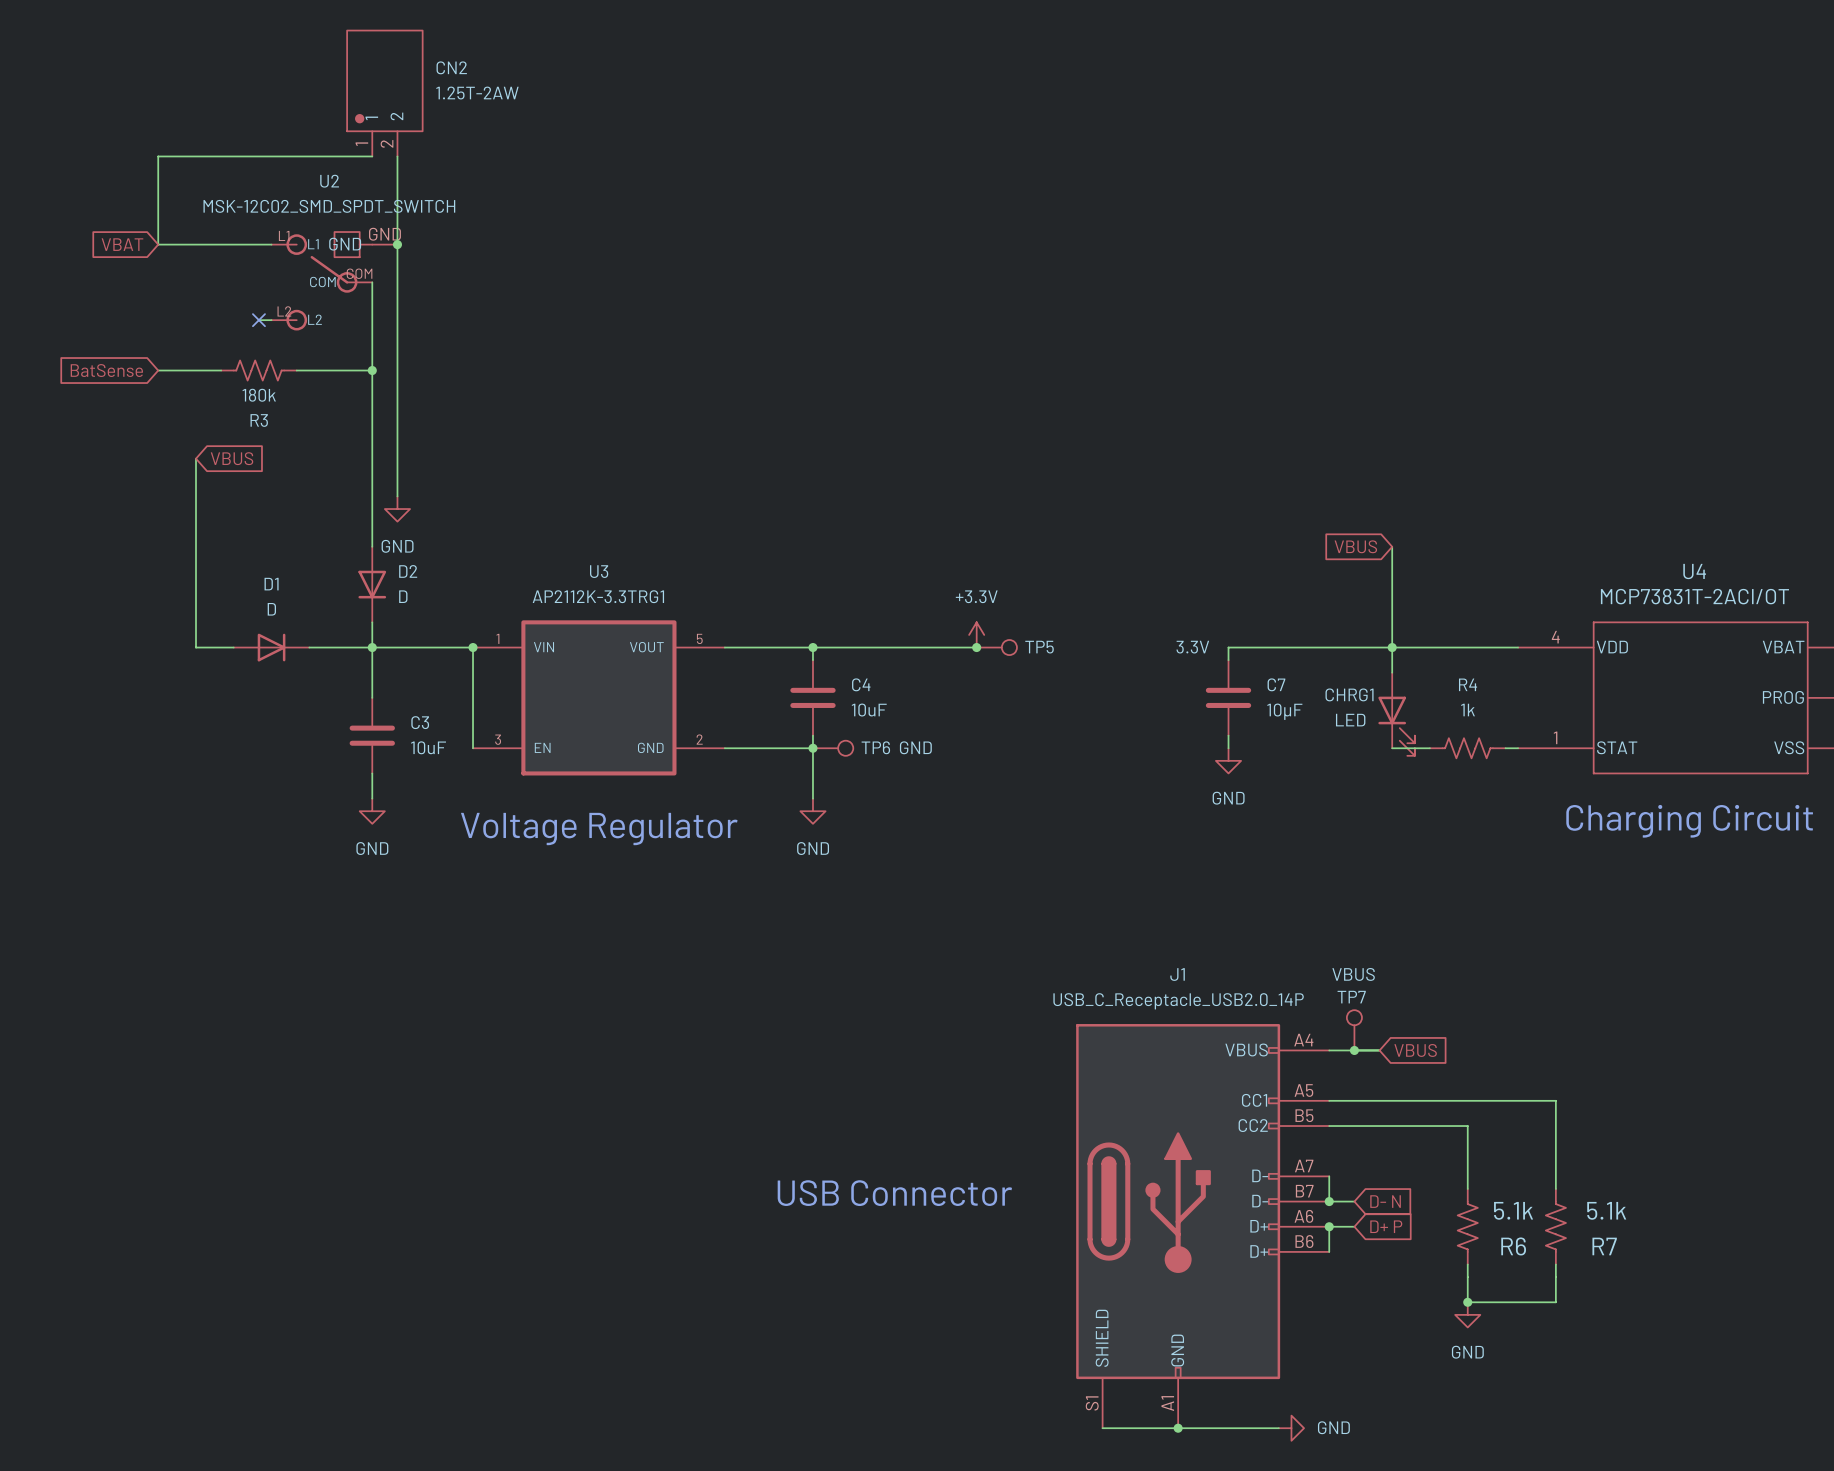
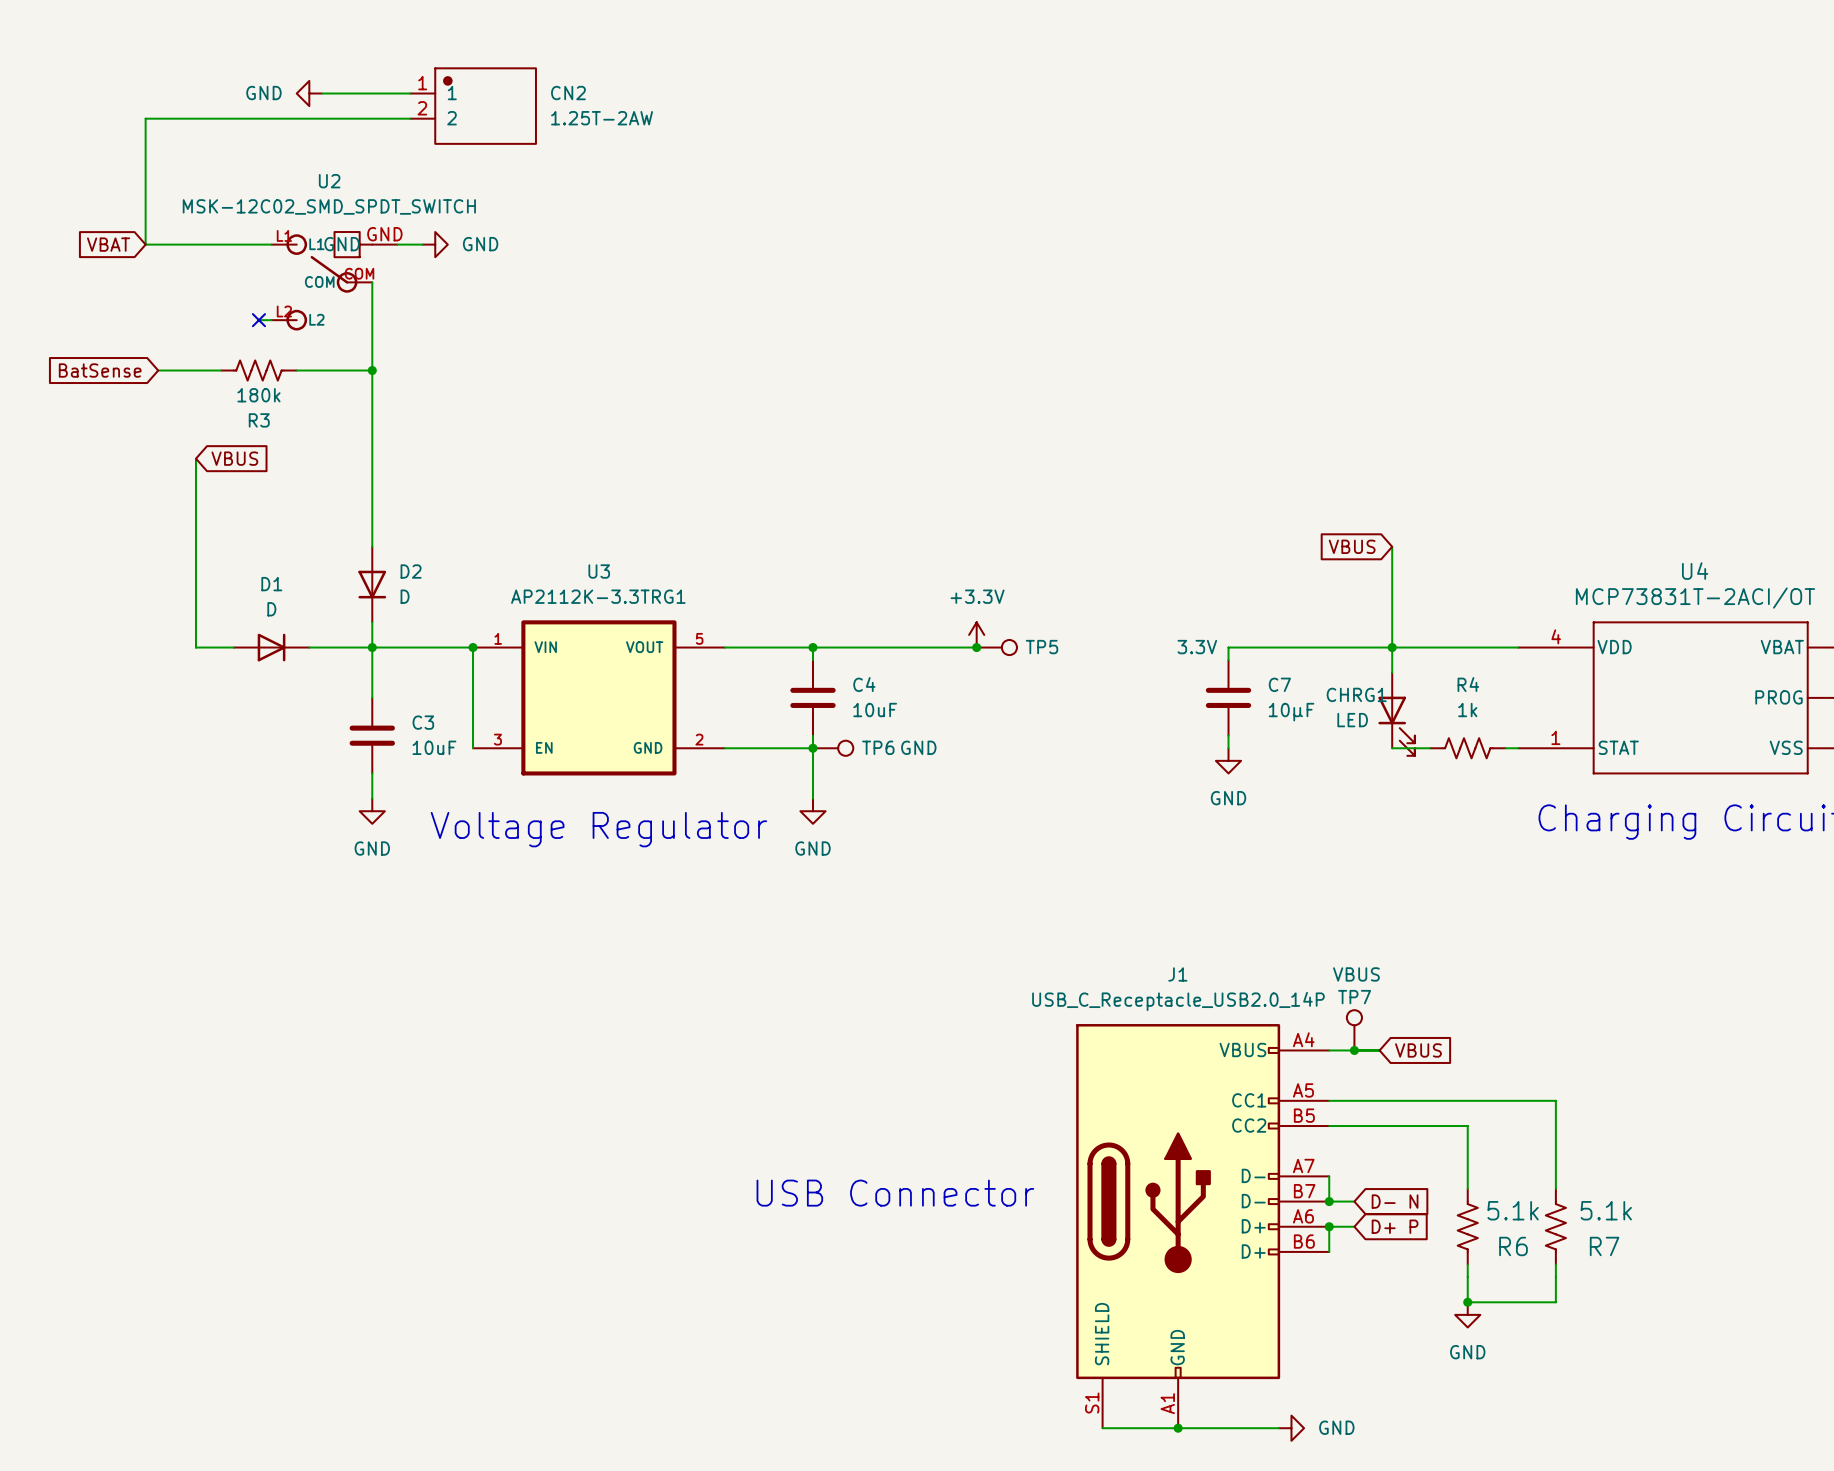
CN2 name position: CN2 (451, 67) -> CN2 (568, 93)
CN2 rotation: 0° (384, 80) -> 90° clockwise (485, 106)
power symbol: none -> GND (309, 93)
wire: none -> (321, 93) (410, 93)
CN2 position: (384, 93) -> (473, 106)
CN2 value position: 1.25T-2AW (477, 93) -> 1.25T-2AW (602, 118)
wire: (372, 156) (158, 156) (158, 244) -> (410, 118) (145, 118) (145, 244) (158, 244)
wire: (397, 156) (397, 496) -> none
global label position: VBAT (122, 244) -> VBAT (108, 244)
wire: none -> (397, 244) (422, 244)
junction: (397, 244) -> none
power symbol: none -> GND (435, 244)
power symbol: GND (397, 509) -> none

